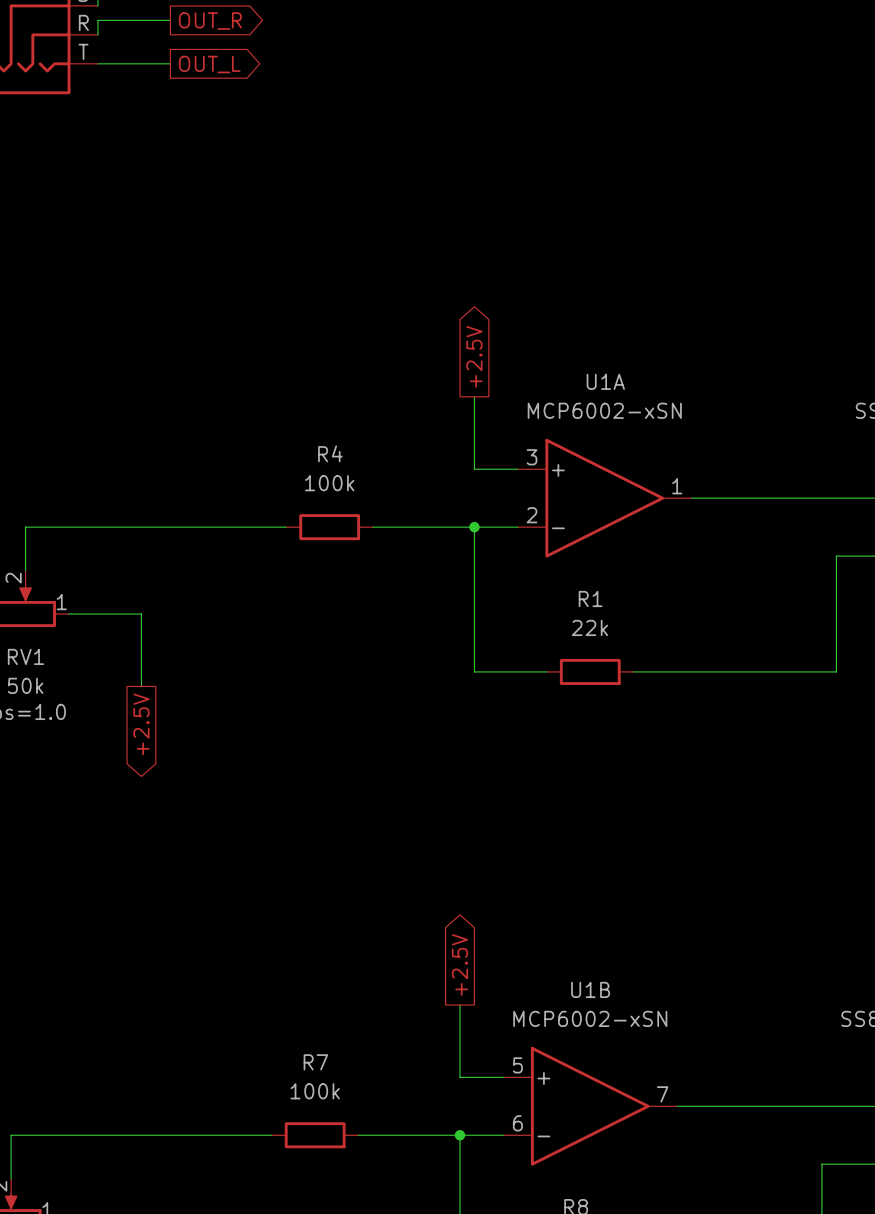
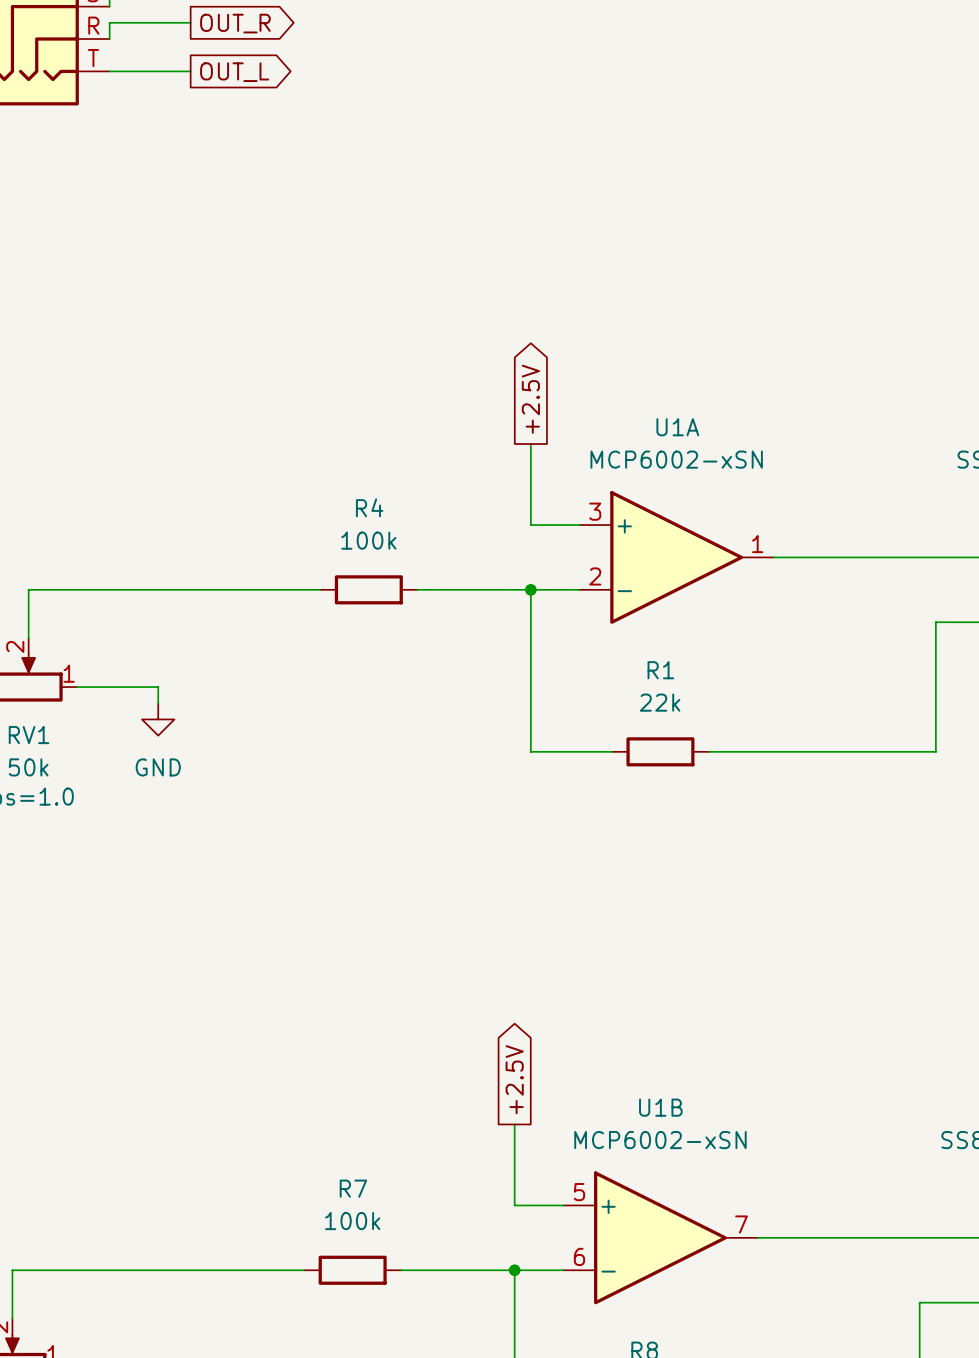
wire: (141, 628) (141, 686) -> none
power symbol: none -> GND (158, 719)
global label: +2.5V (141, 724) -> none

